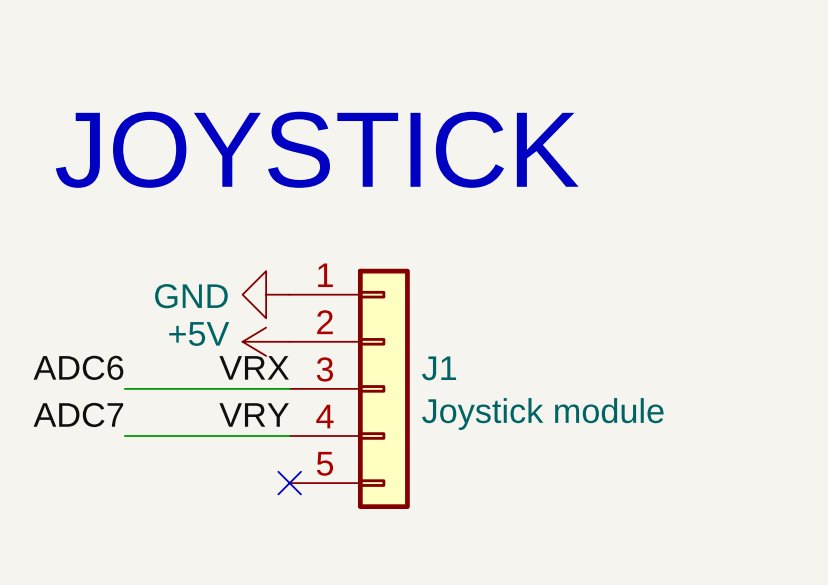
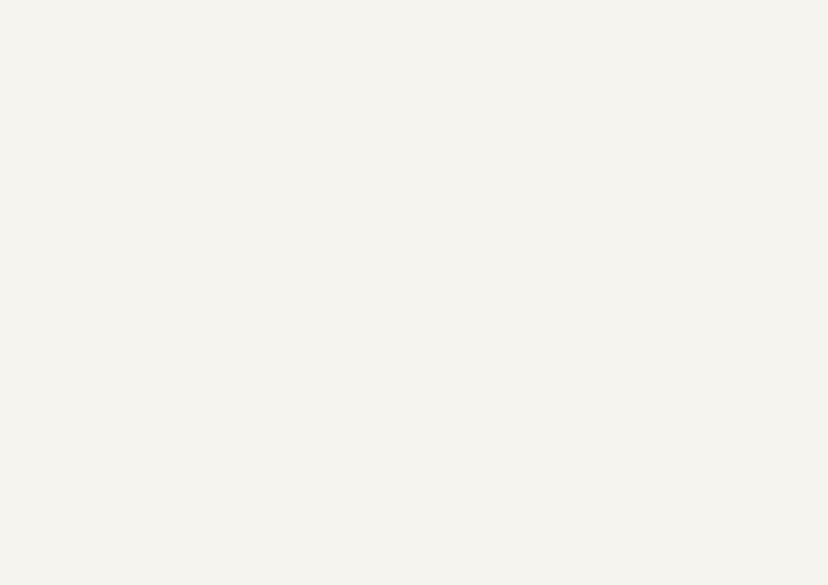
text: JOYSTICK (317, 149) -> none
power symbol: GND (266, 294) -> none
power symbol: +5V (266, 341) -> none
label: ADC6 (78, 367) -> none
label: VRX (254, 367) -> none
wire: (124, 388) (289, 388) -> none
J1: Joystick module (349, 388) -> none
label: ADC7 (78, 414) -> none
label: VRY (254, 414) -> none
wire: (124, 435) (289, 435) -> none
no-connect mark: (289, 483) -> none

